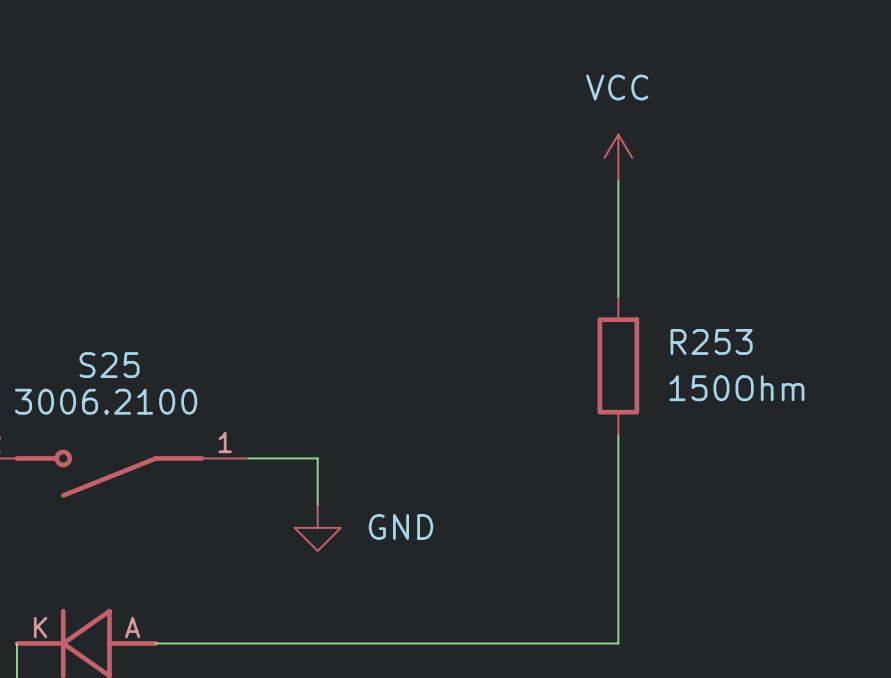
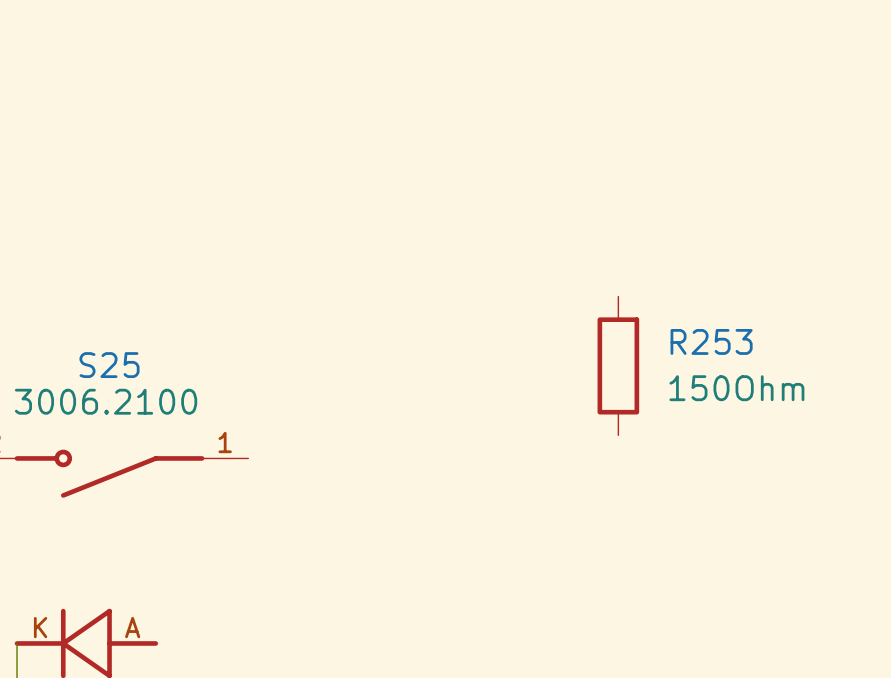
power symbol: VCC (618, 157) -> none
wire: (618, 180) (618, 296) -> none
wire: (618, 435) (618, 643) (155, 643) -> none
wire: (248, 458) (317, 458) (317, 504) -> none
power symbol: GND (317, 527) -> none

